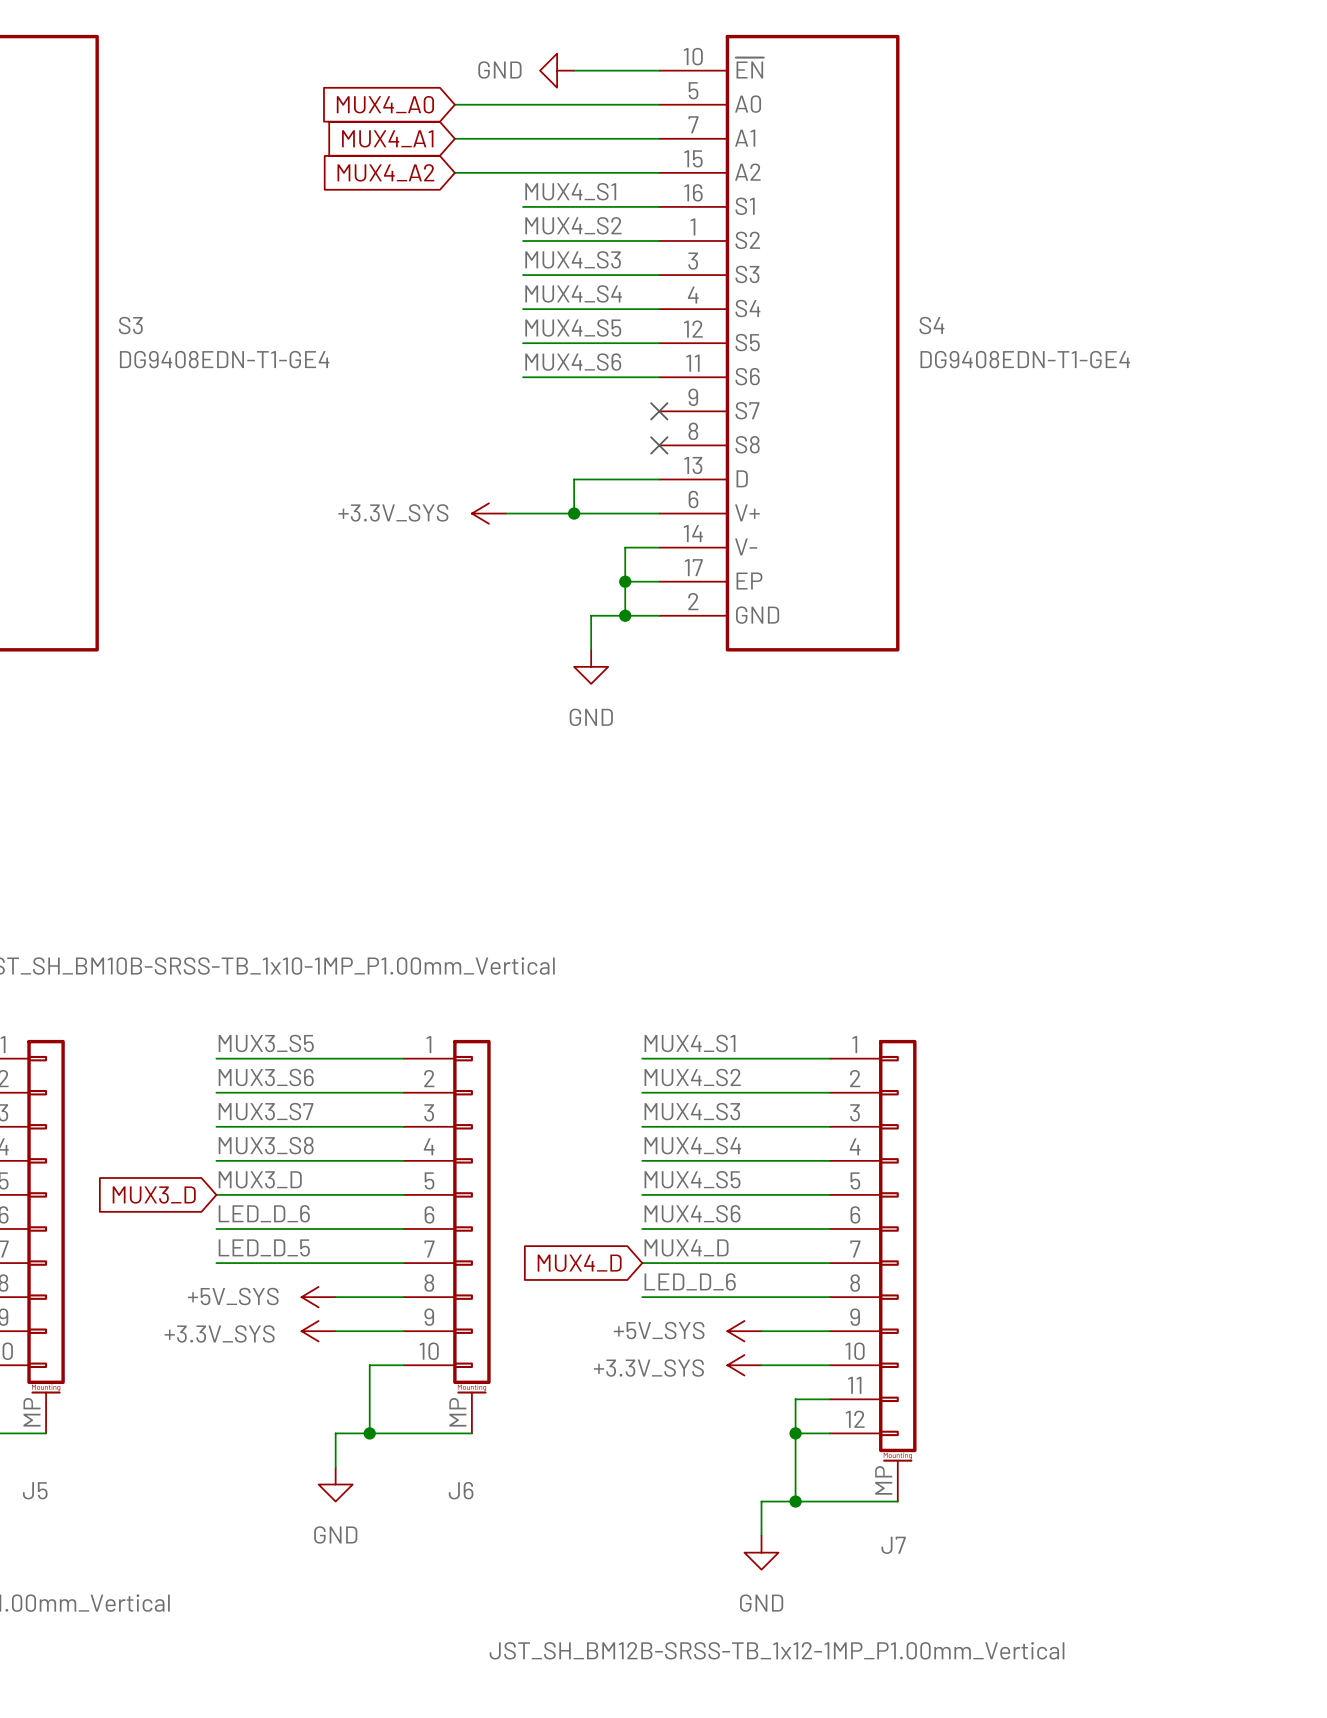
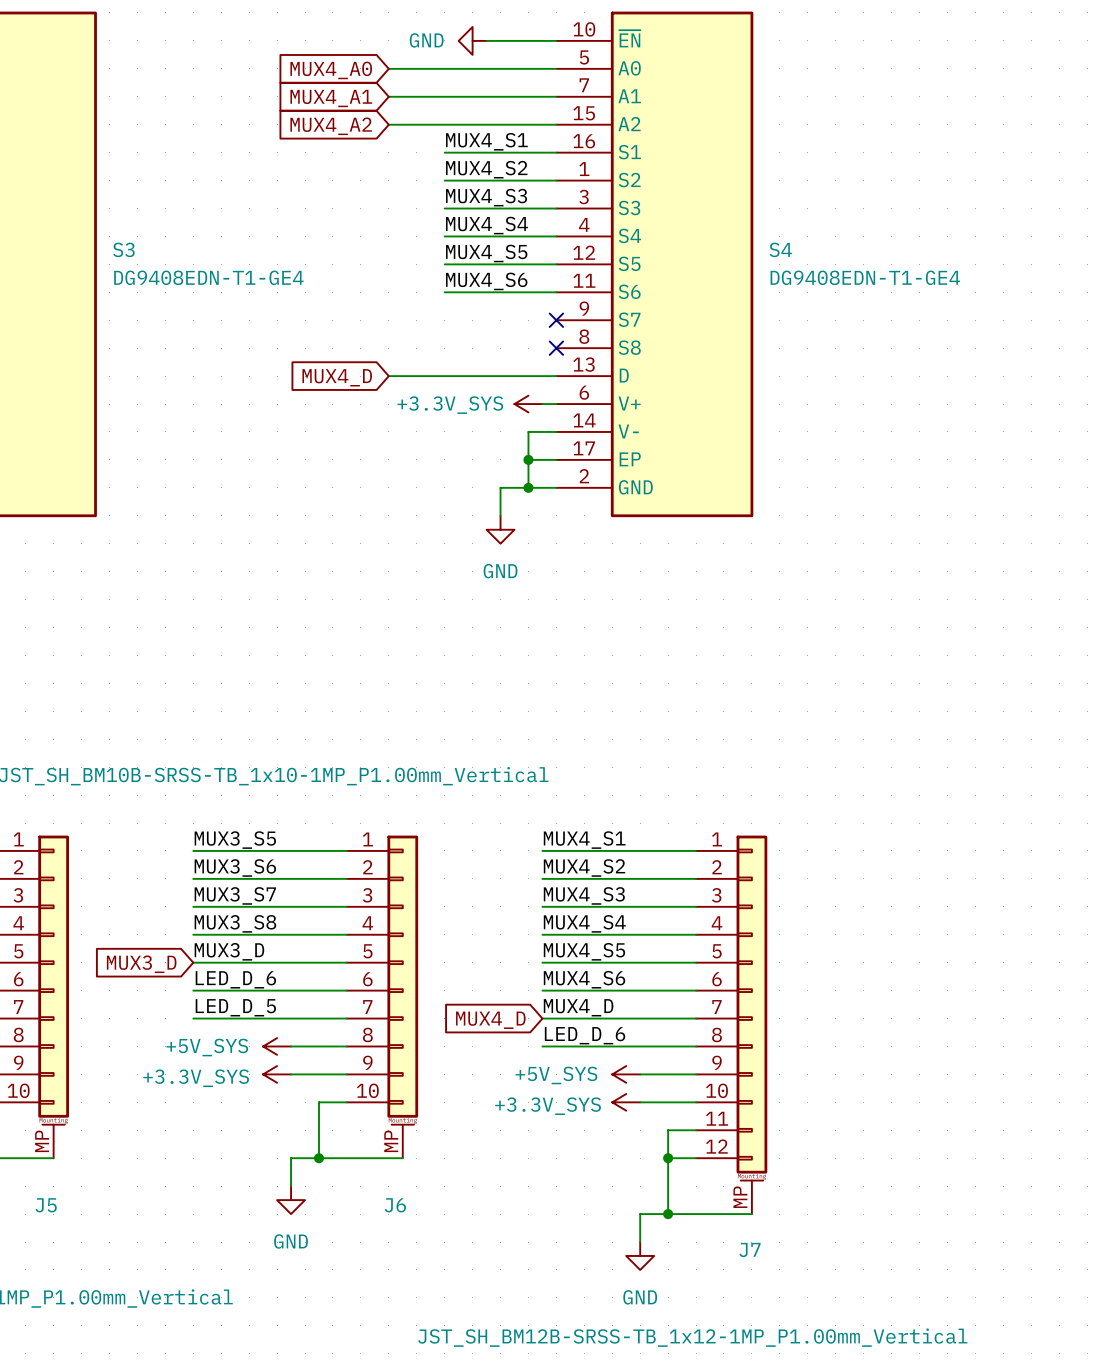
global label: none -> MUX4_D (337, 377)
wire: (574, 479) (574, 513) -> (486, 376) (388, 376)
power symbol position: +3.3V_SYS (488, 513) -> +3.3V_SYS (528, 404)
wire: (505, 513) (642, 513) -> none
junction: (574, 513) -> none

